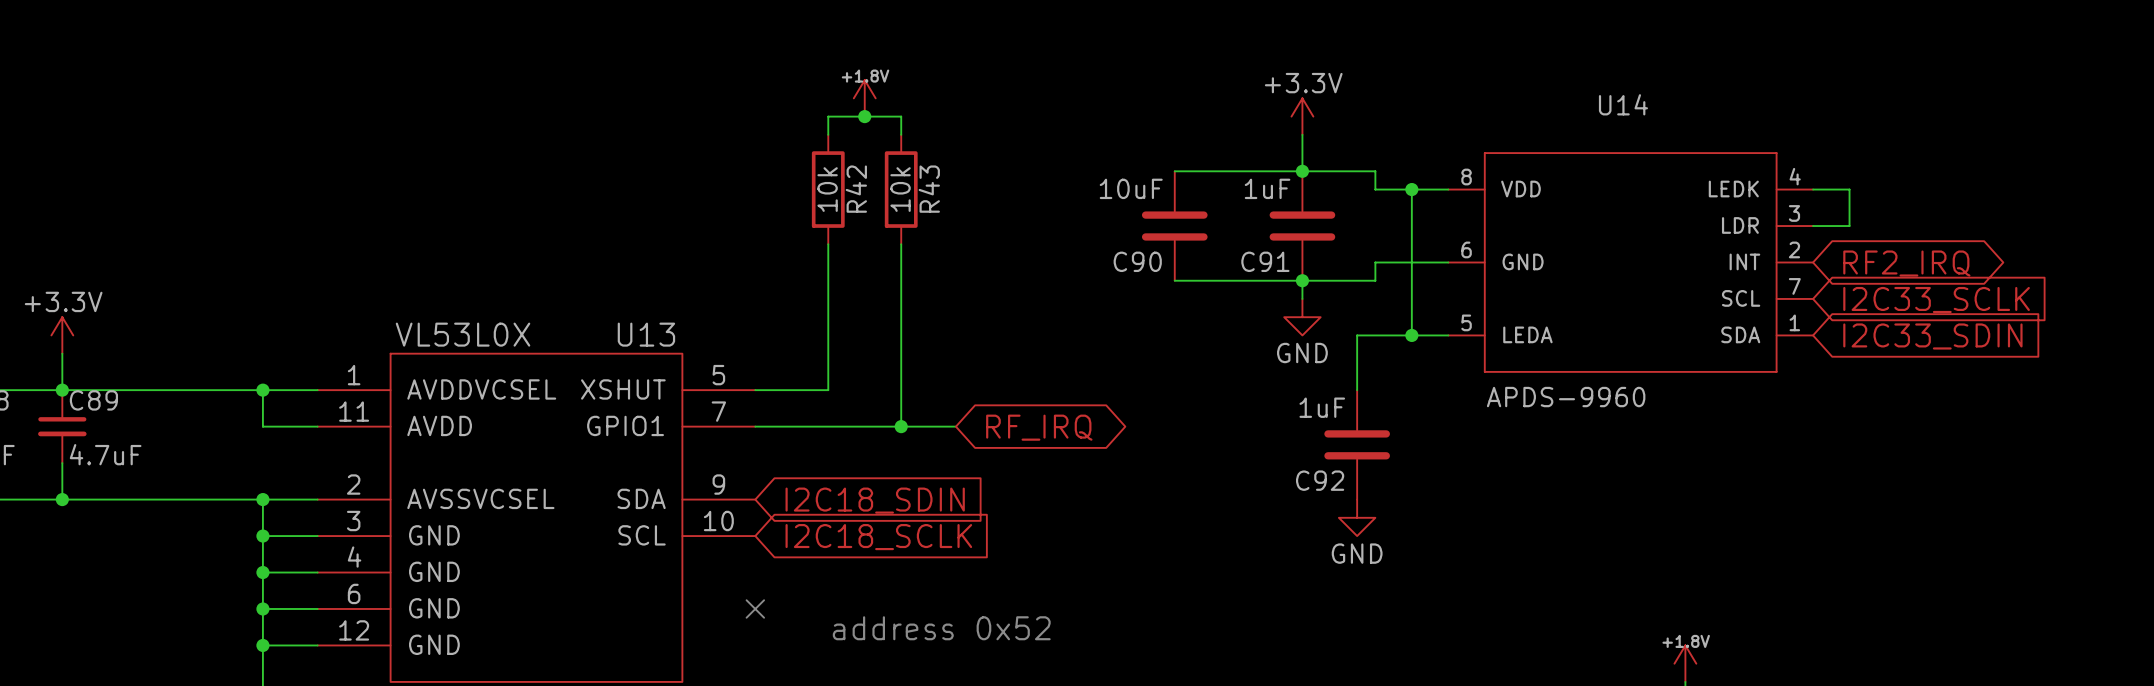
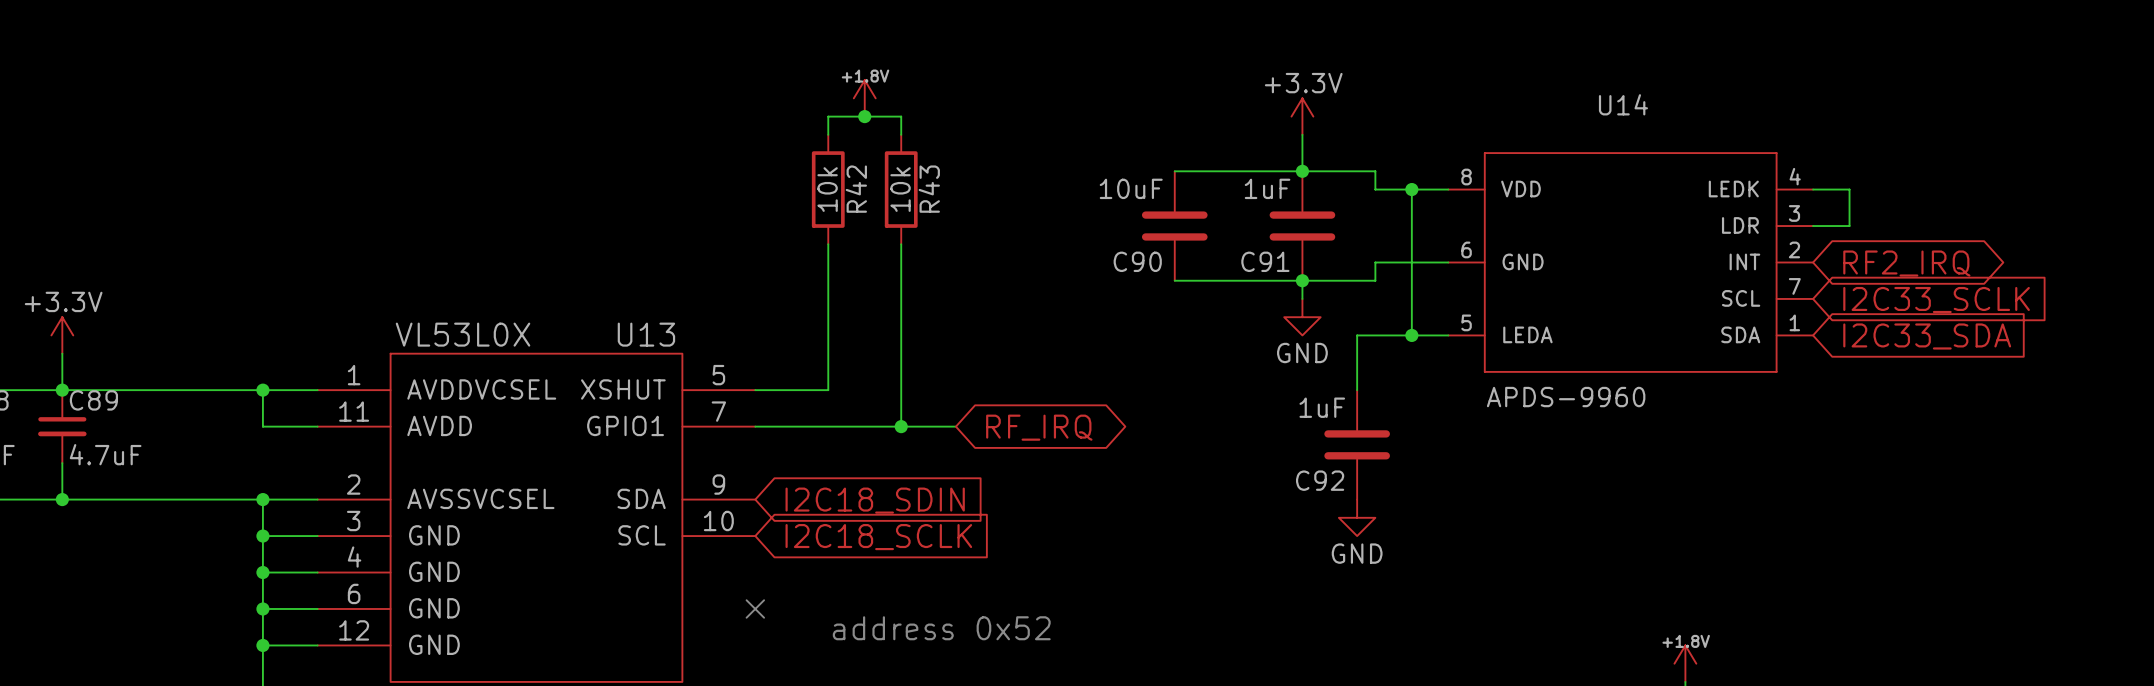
global label: I2C33_SDIN (1932, 336) -> I2C33_SDA (1927, 336)

